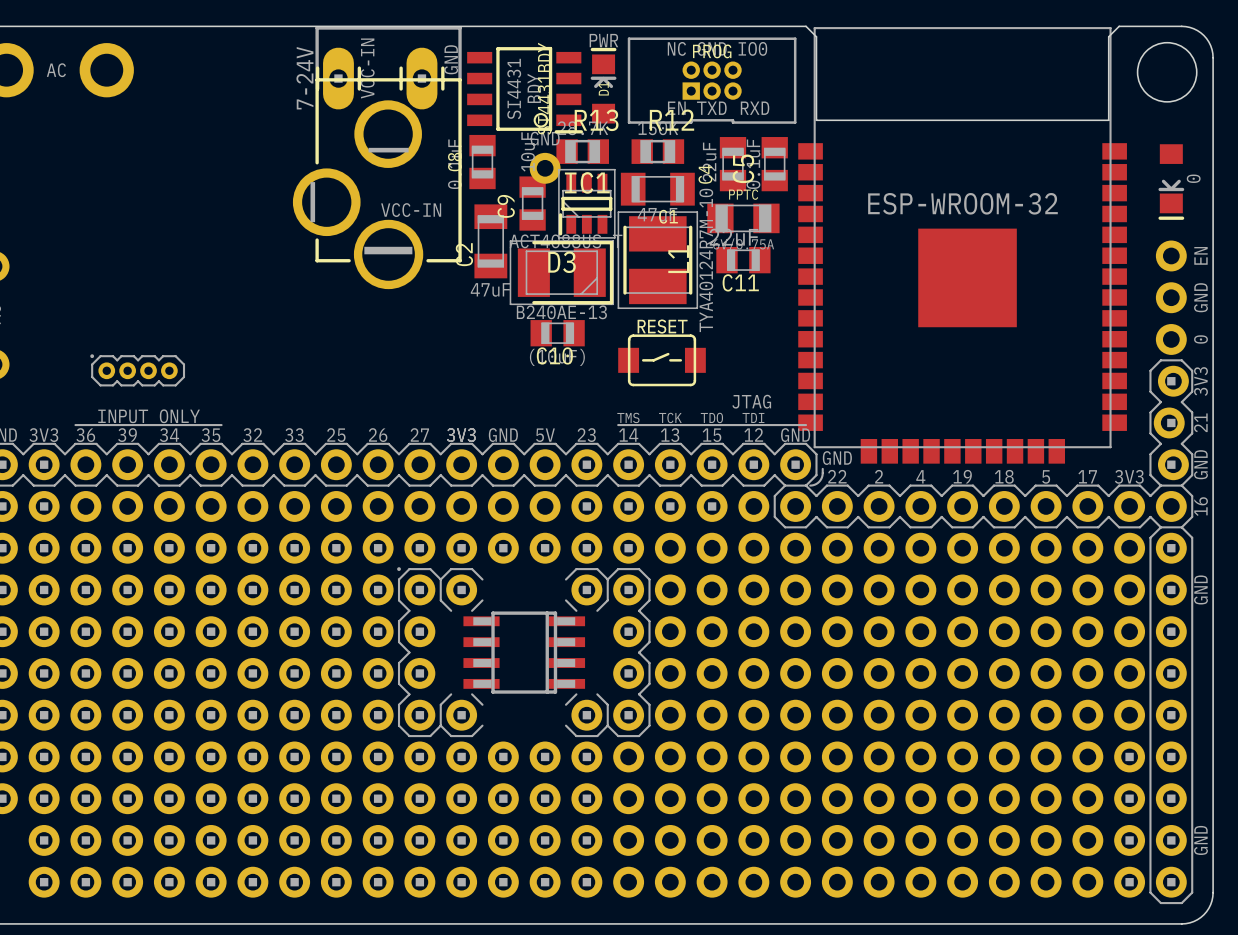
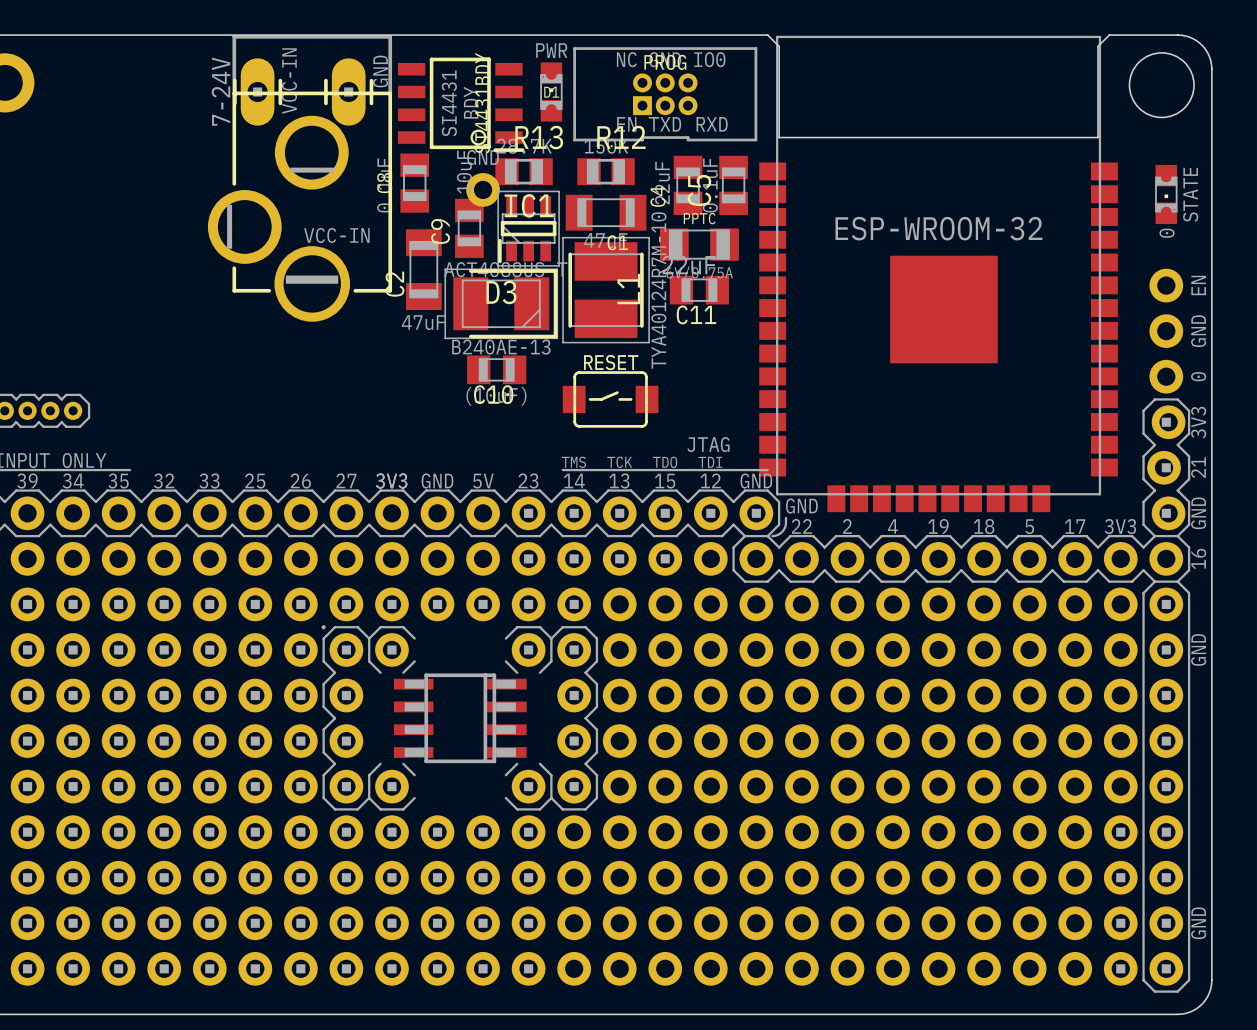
D1 value: PWR (603, 40) -> none
text: none -> PWR (551, 50)
D1 footprint: [590, 47, 617, 124] -> [540, 62, 563, 122]
part footprint: [1158, 144, 1185, 220] -> [1155, 164, 1178, 225]
text: none -> STATE (1190, 194)
text position: 0 (1193, 178) -> 0 (1167, 233)

